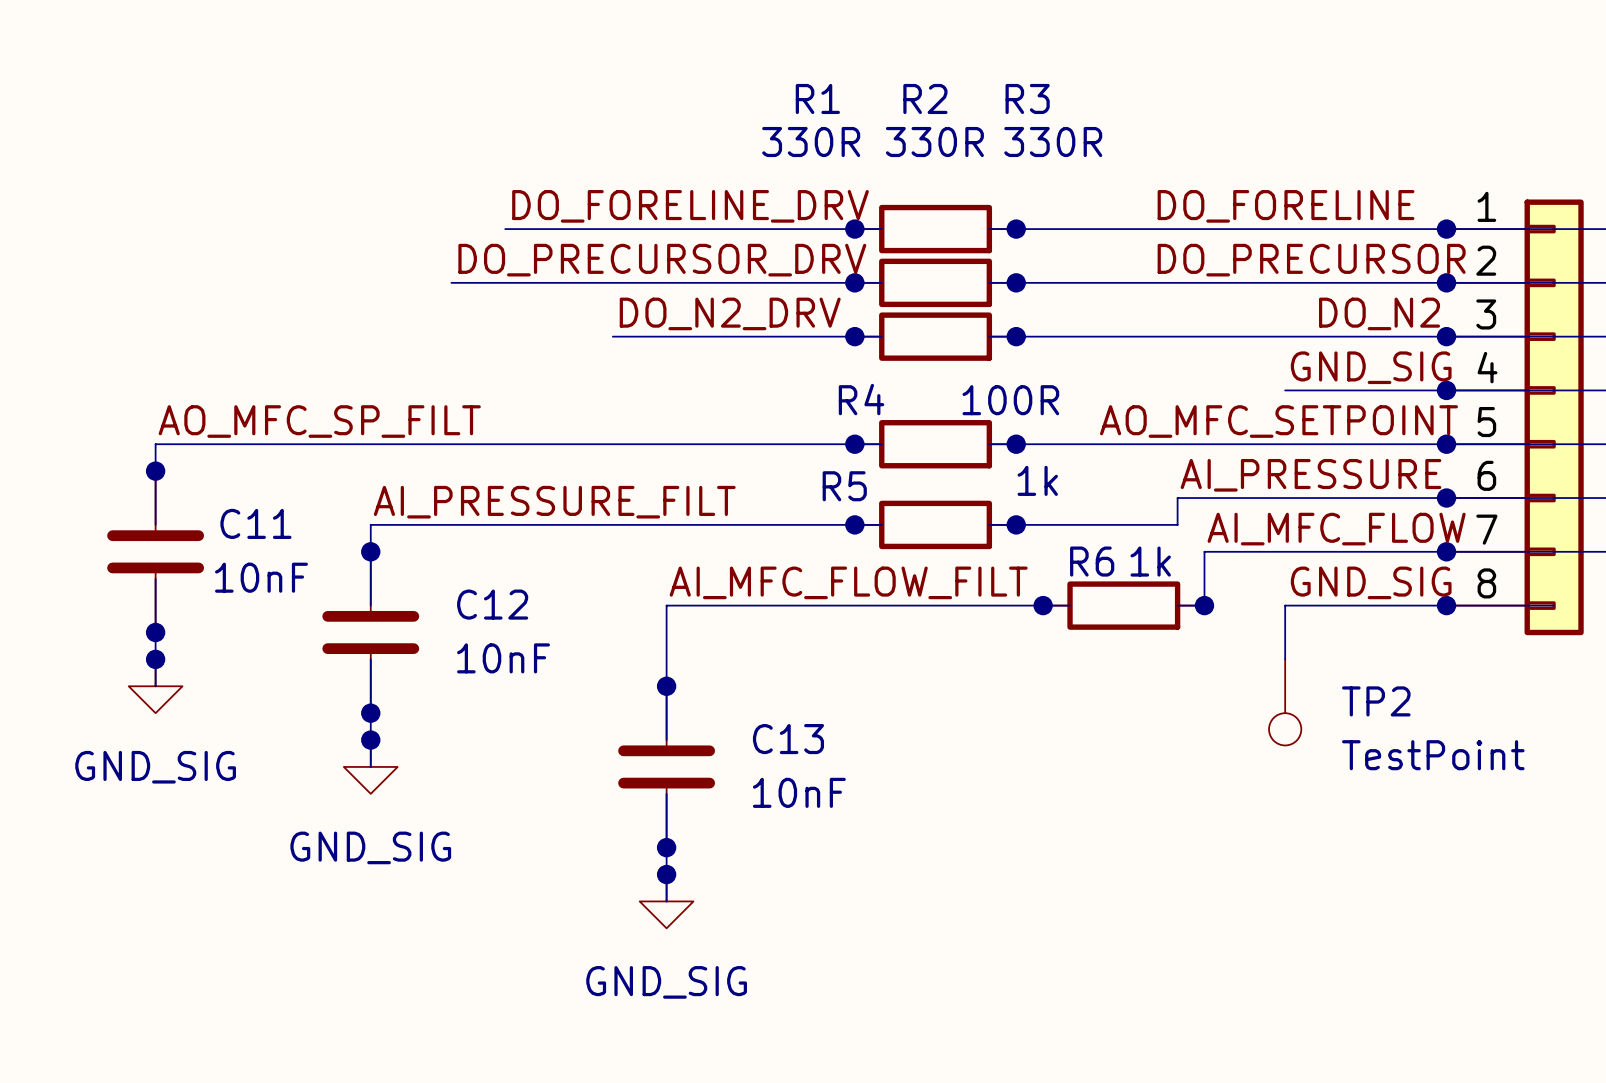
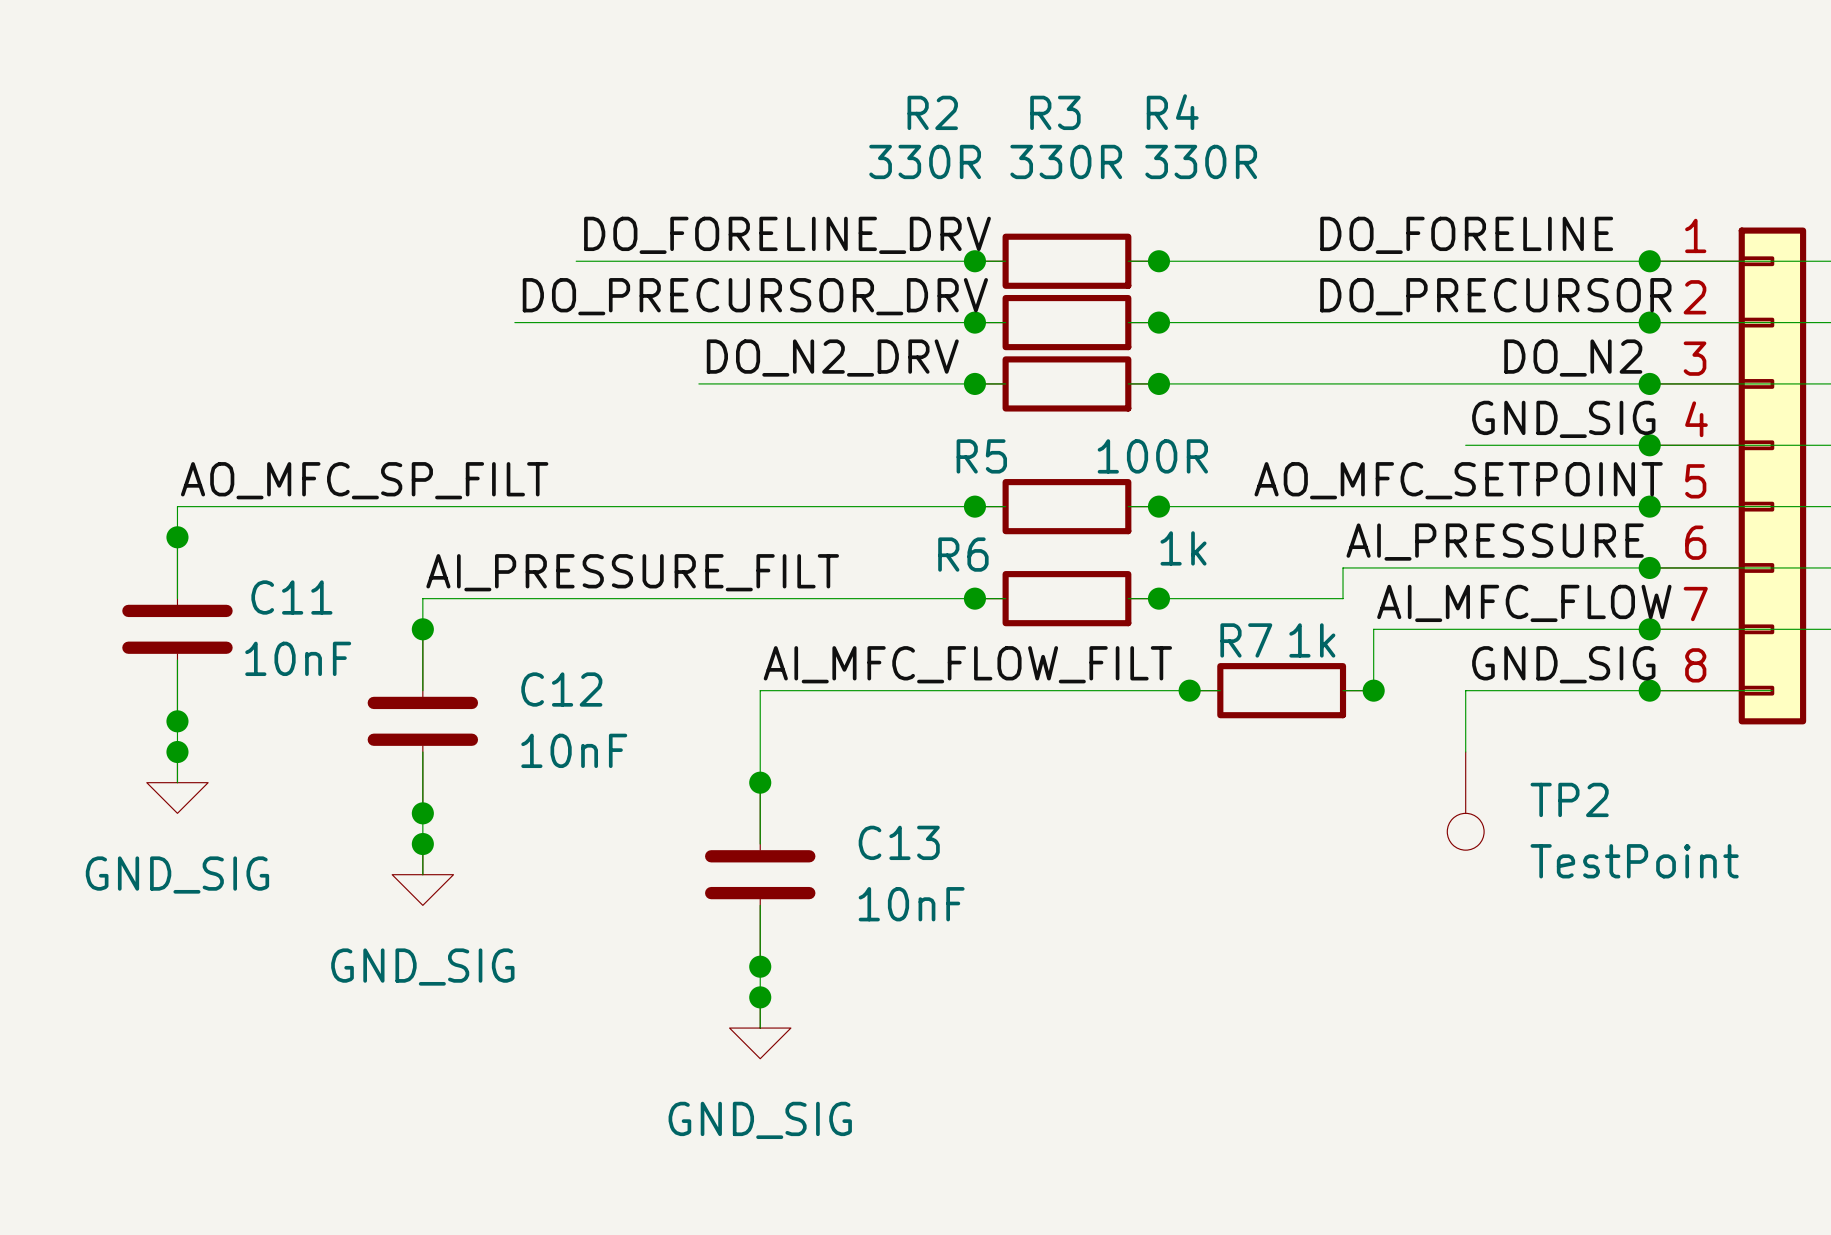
R1 name: R1 (817, 98) -> R2 (932, 112)
R2 name: R2 (925, 98) -> R3 (1055, 112)
R3 name: R3 (1027, 98) -> R4 (1172, 112)
R4 name: R4 (861, 399) -> R5 (981, 456)
R5 name: R5 (844, 486) -> R6 (963, 554)
R6 name: R6 (1092, 561) -> R7 (1246, 640)

